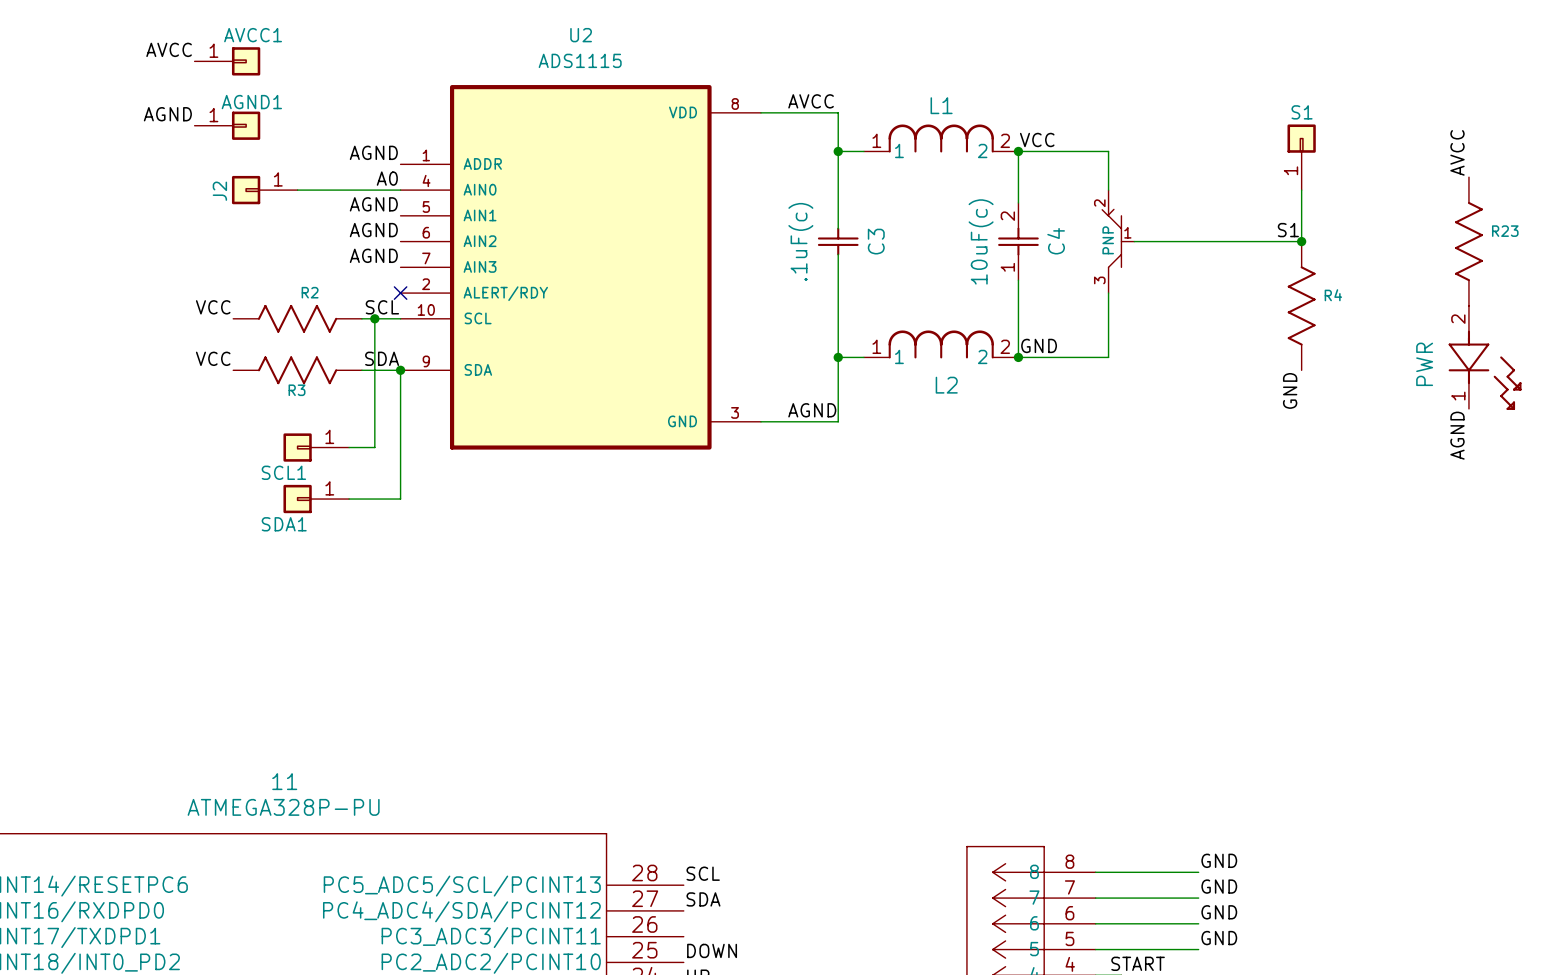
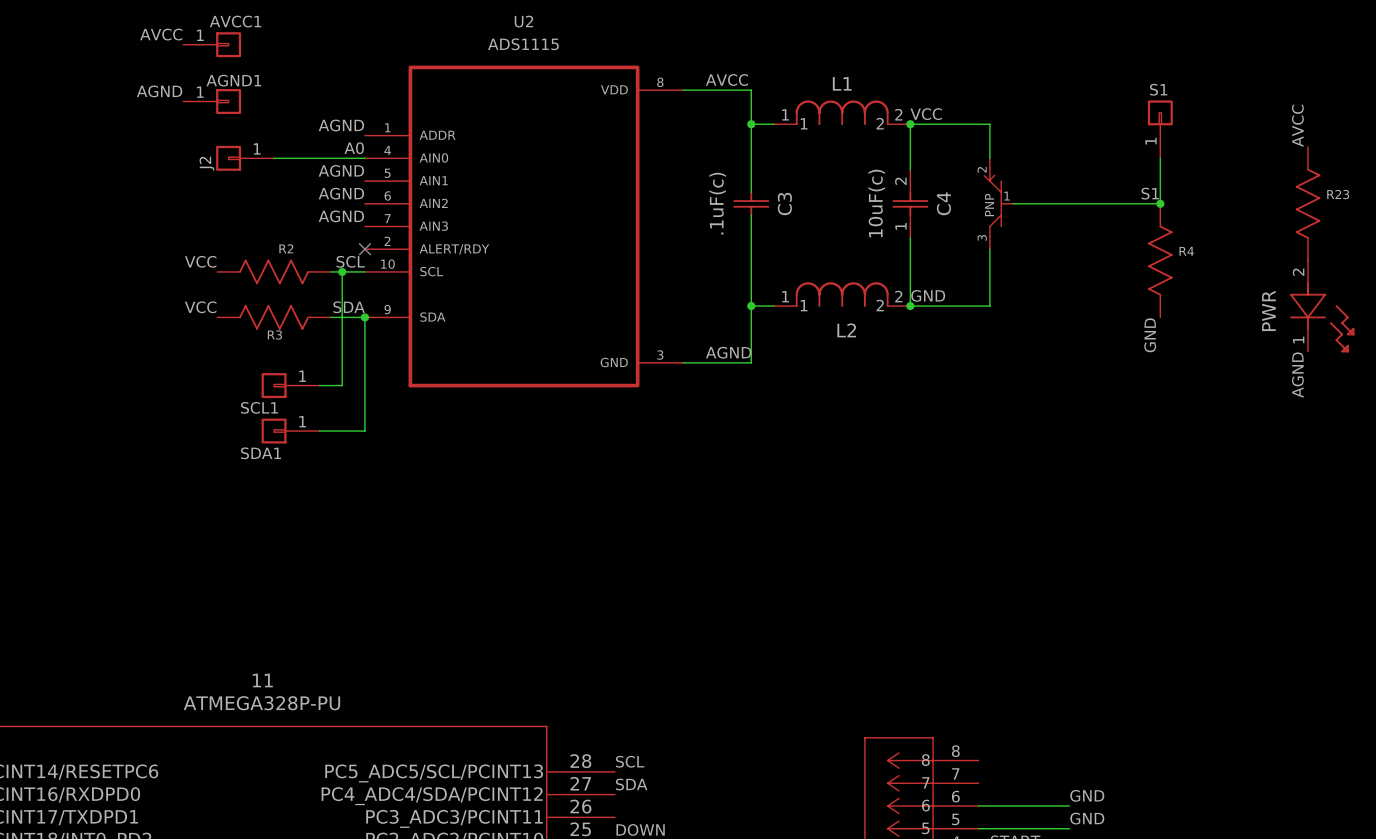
label: GND (1219, 860) -> none
wire: (1095, 872) (1198, 872) -> none
label: GND (1219, 886) -> none
wire: (1095, 898) (1198, 898) -> none

